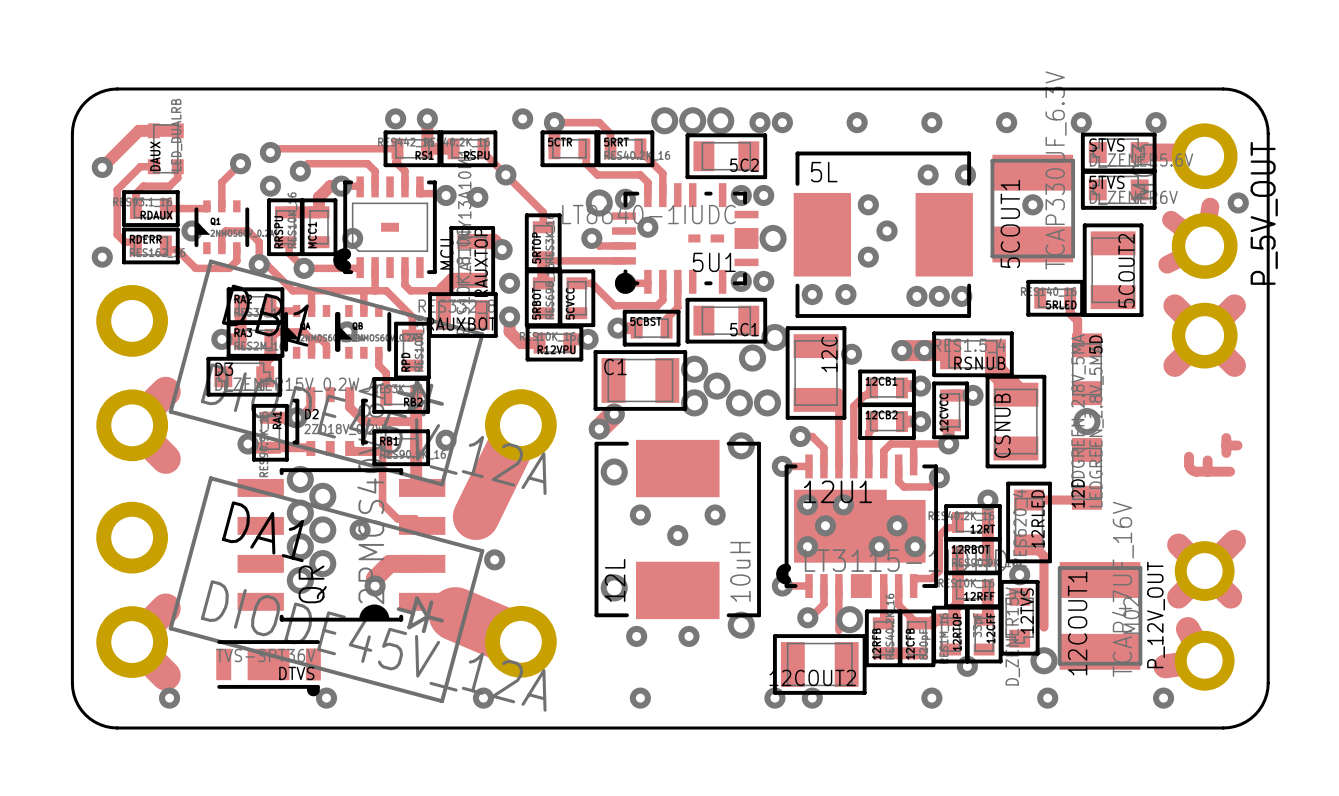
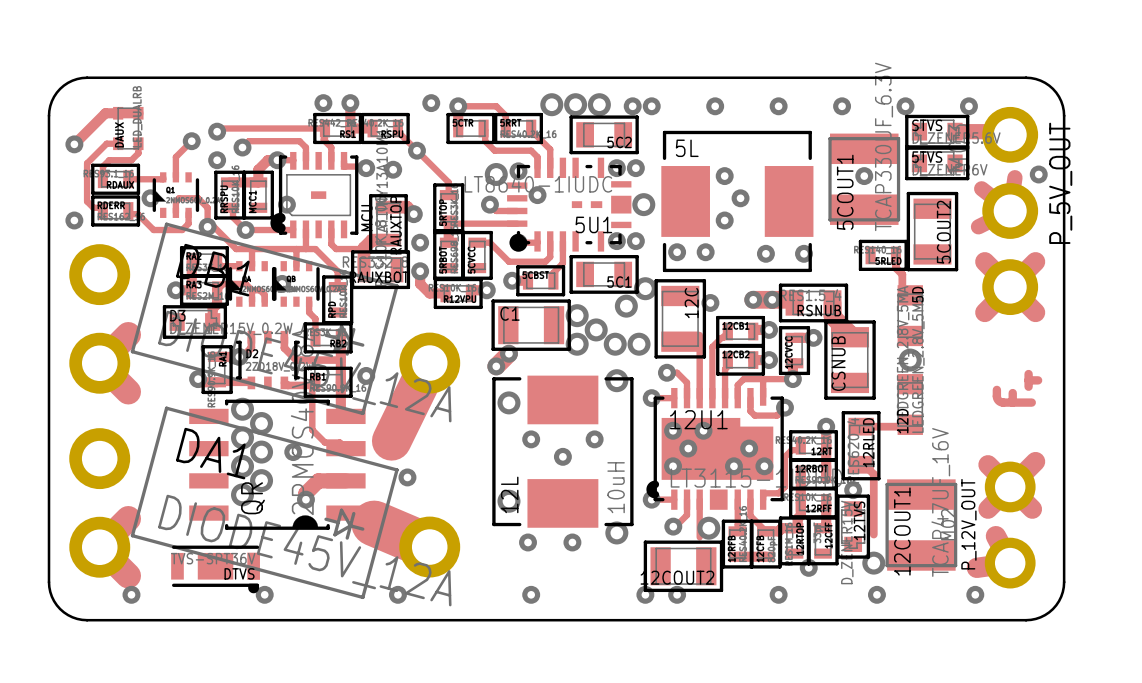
via: (928, 174) -> none
via: (965, 174) -> none
via: (939, 296) -> none

